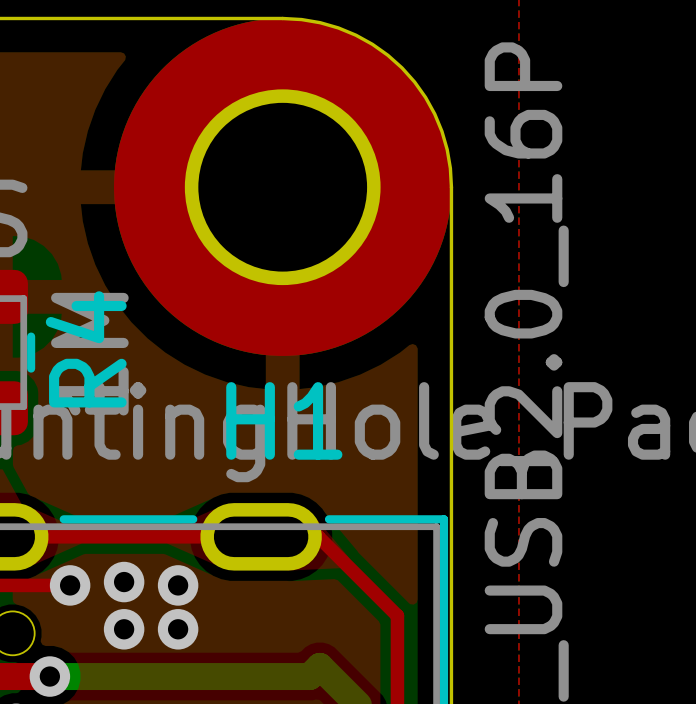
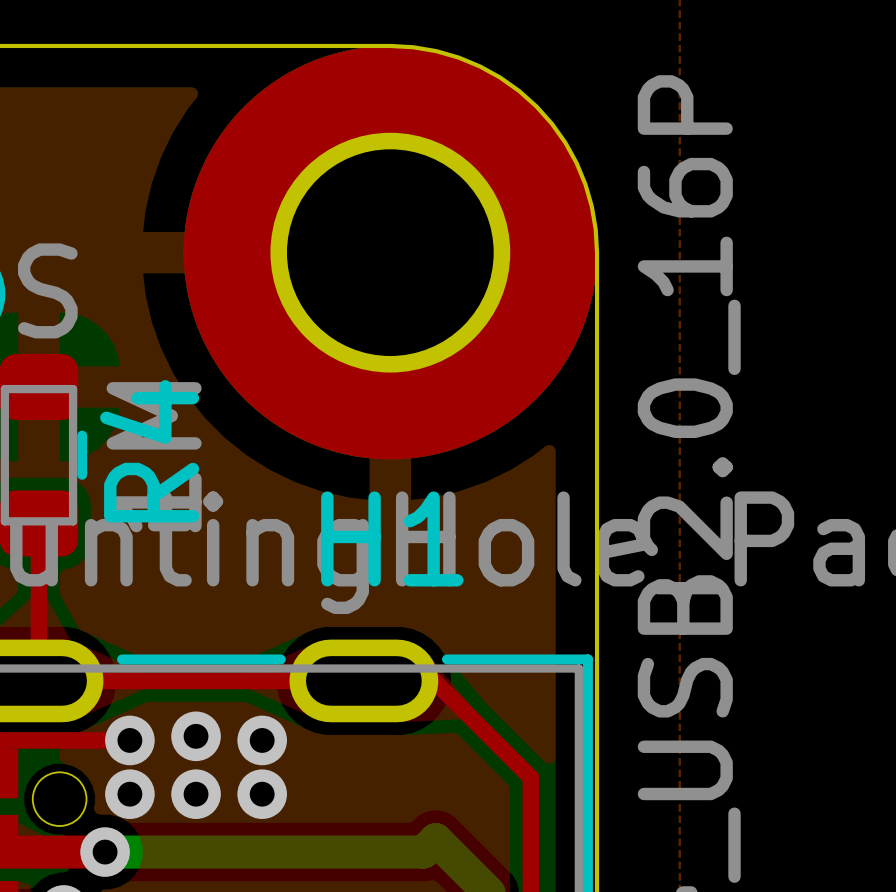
via: none -> (129, 794)

